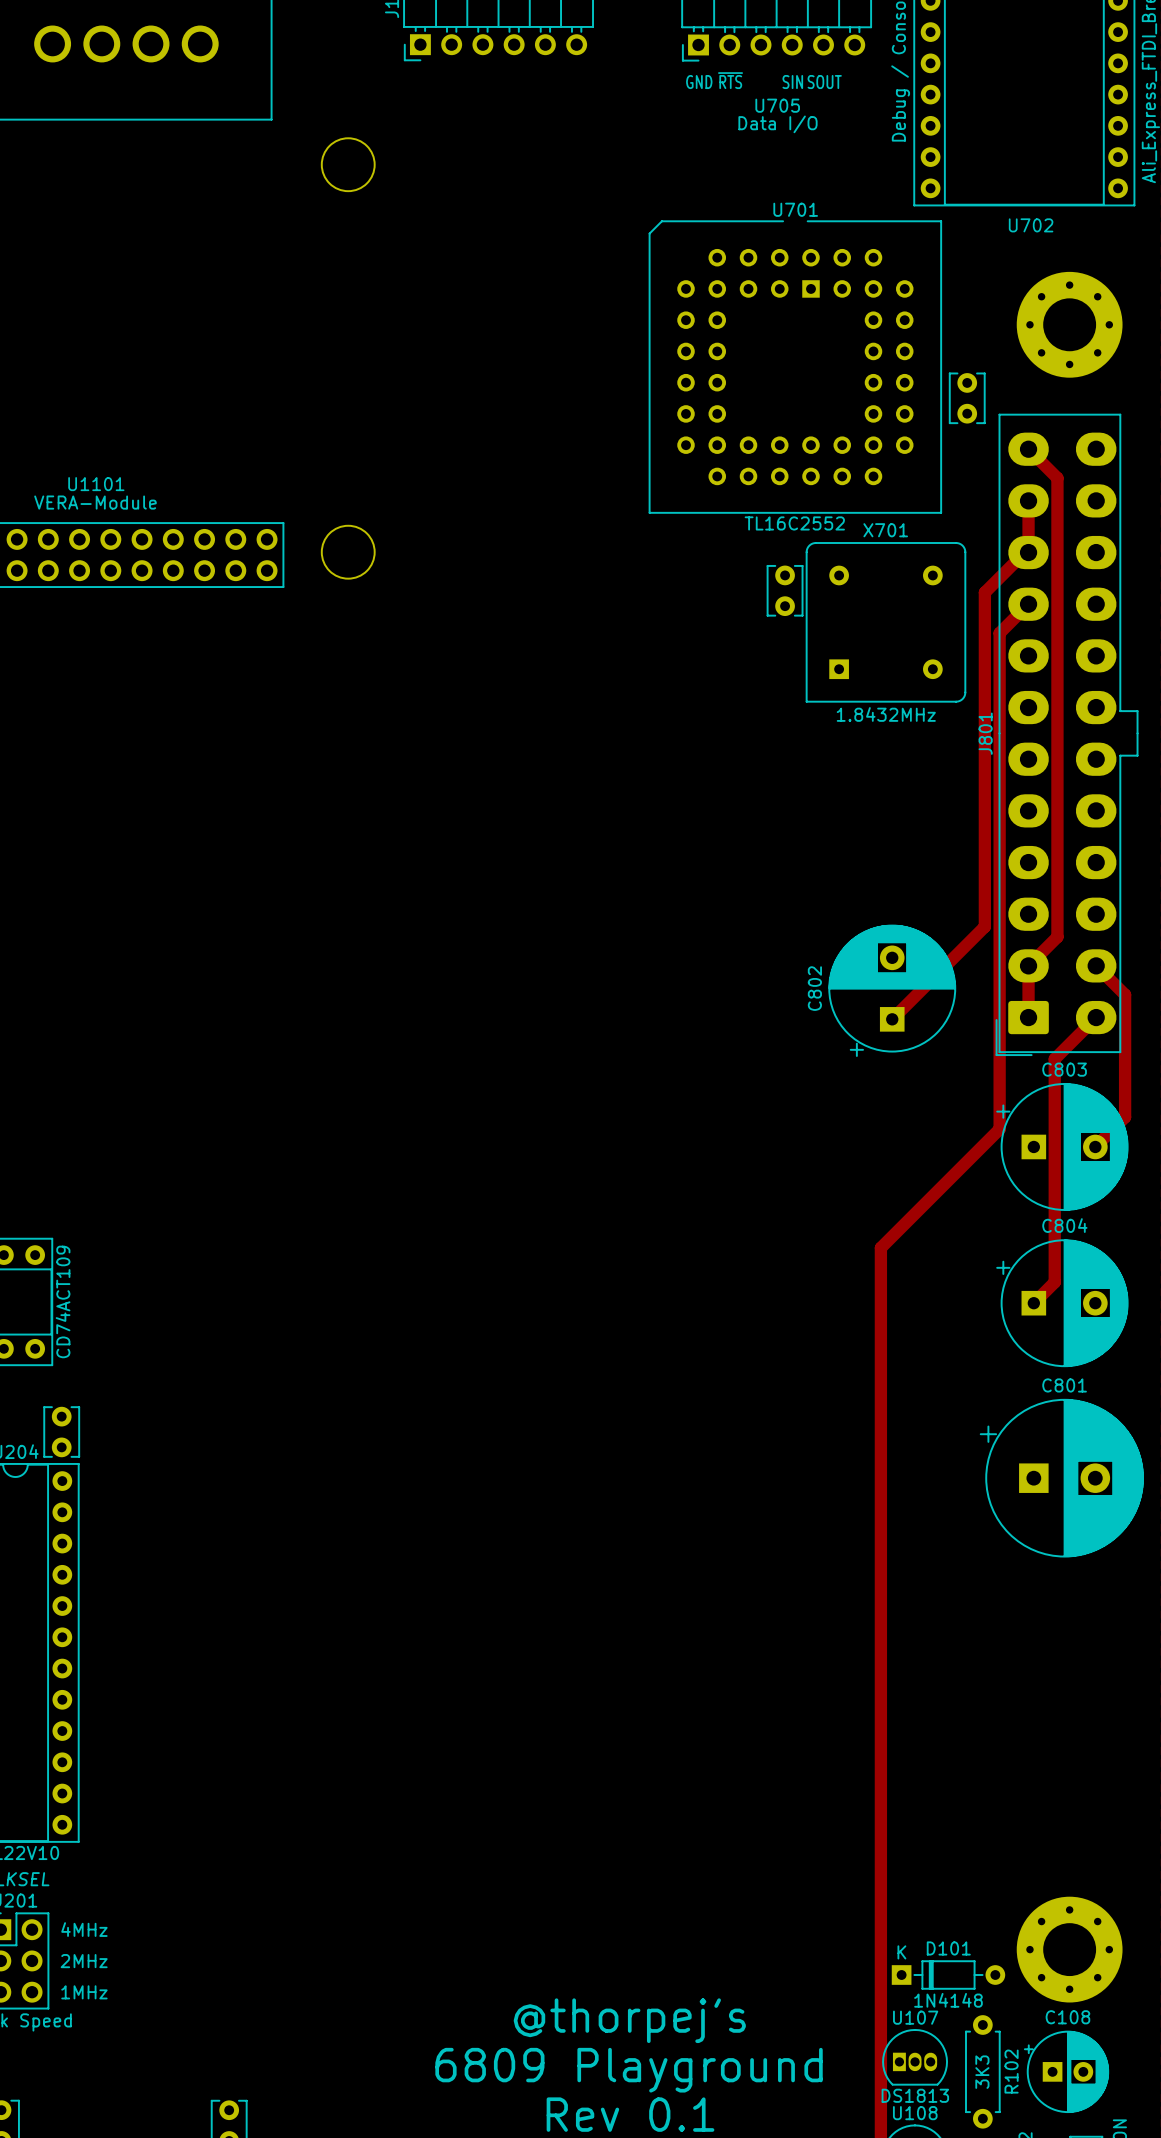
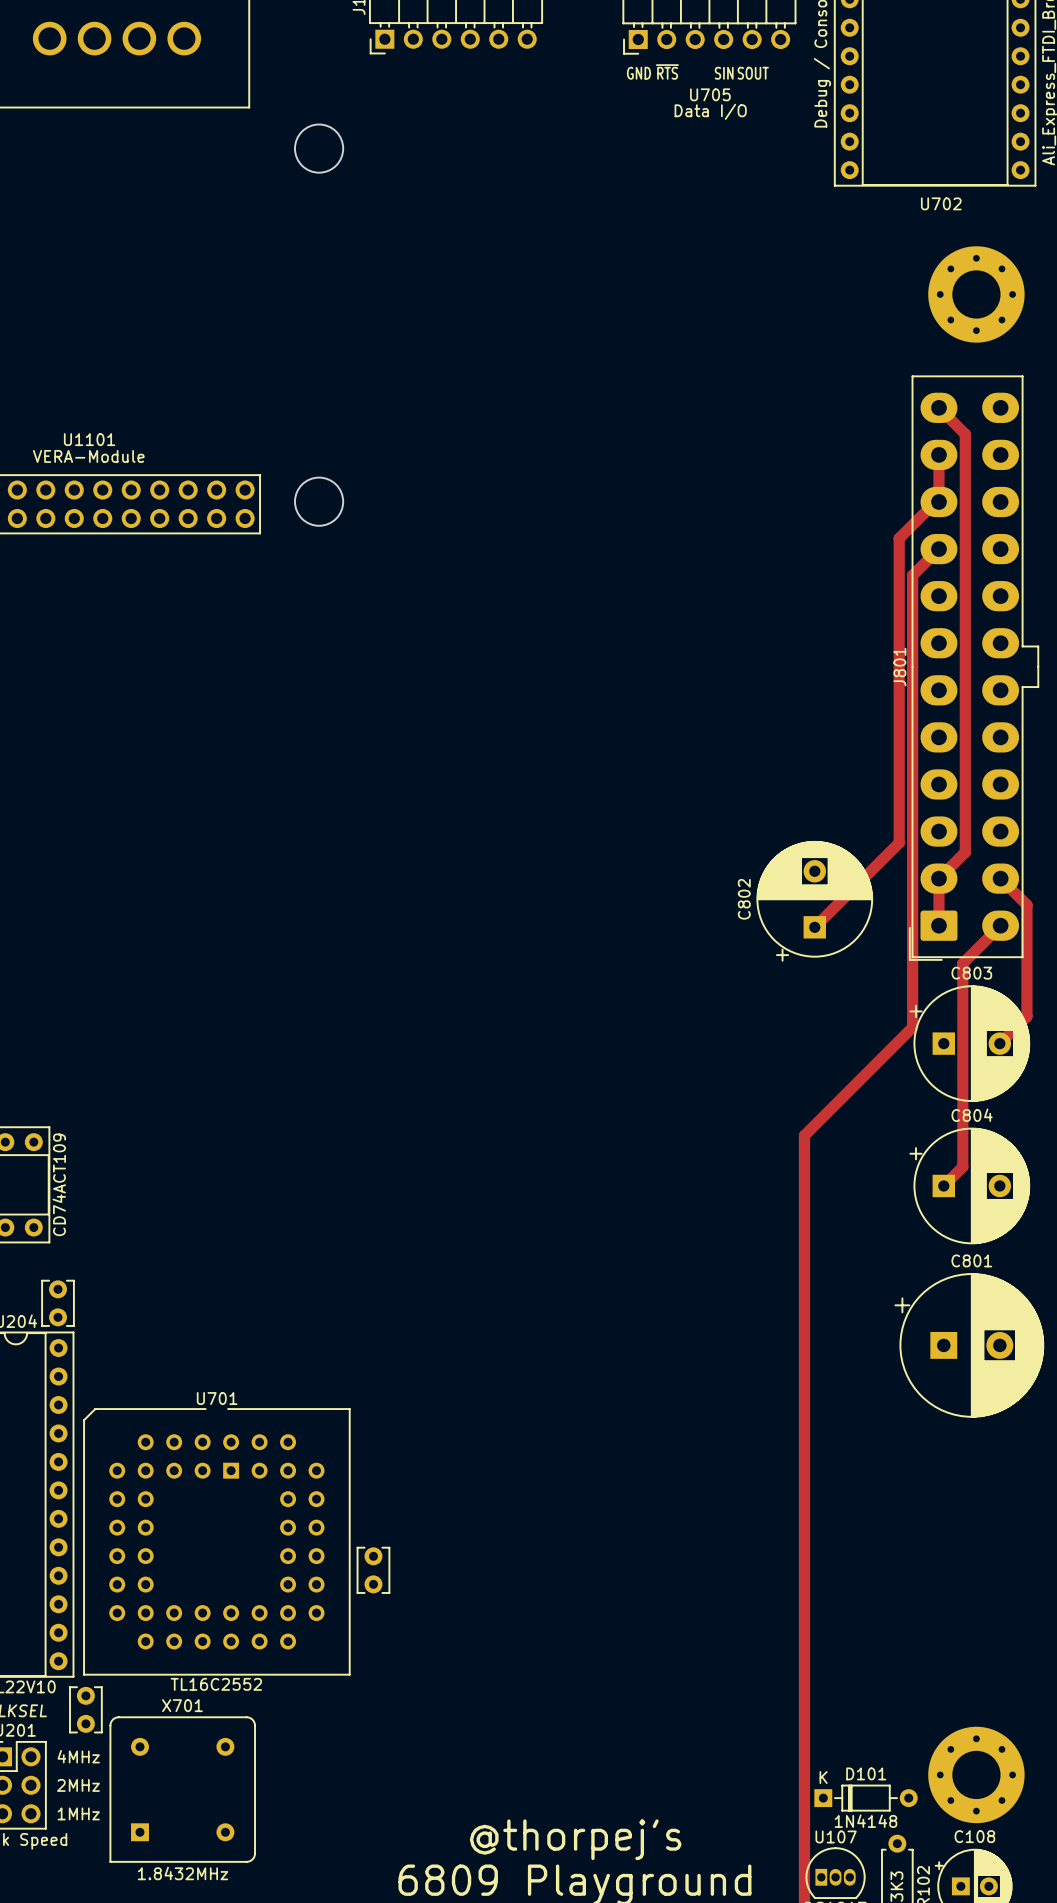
U701 position: (795, 367) -> (216, 1541)
part: (967, 398) -> none
part: (785, 590) -> none
X701 position: (885, 622) -> (182, 1789)
part: none -> (373, 1570)
part: none -> (85, 1709)

